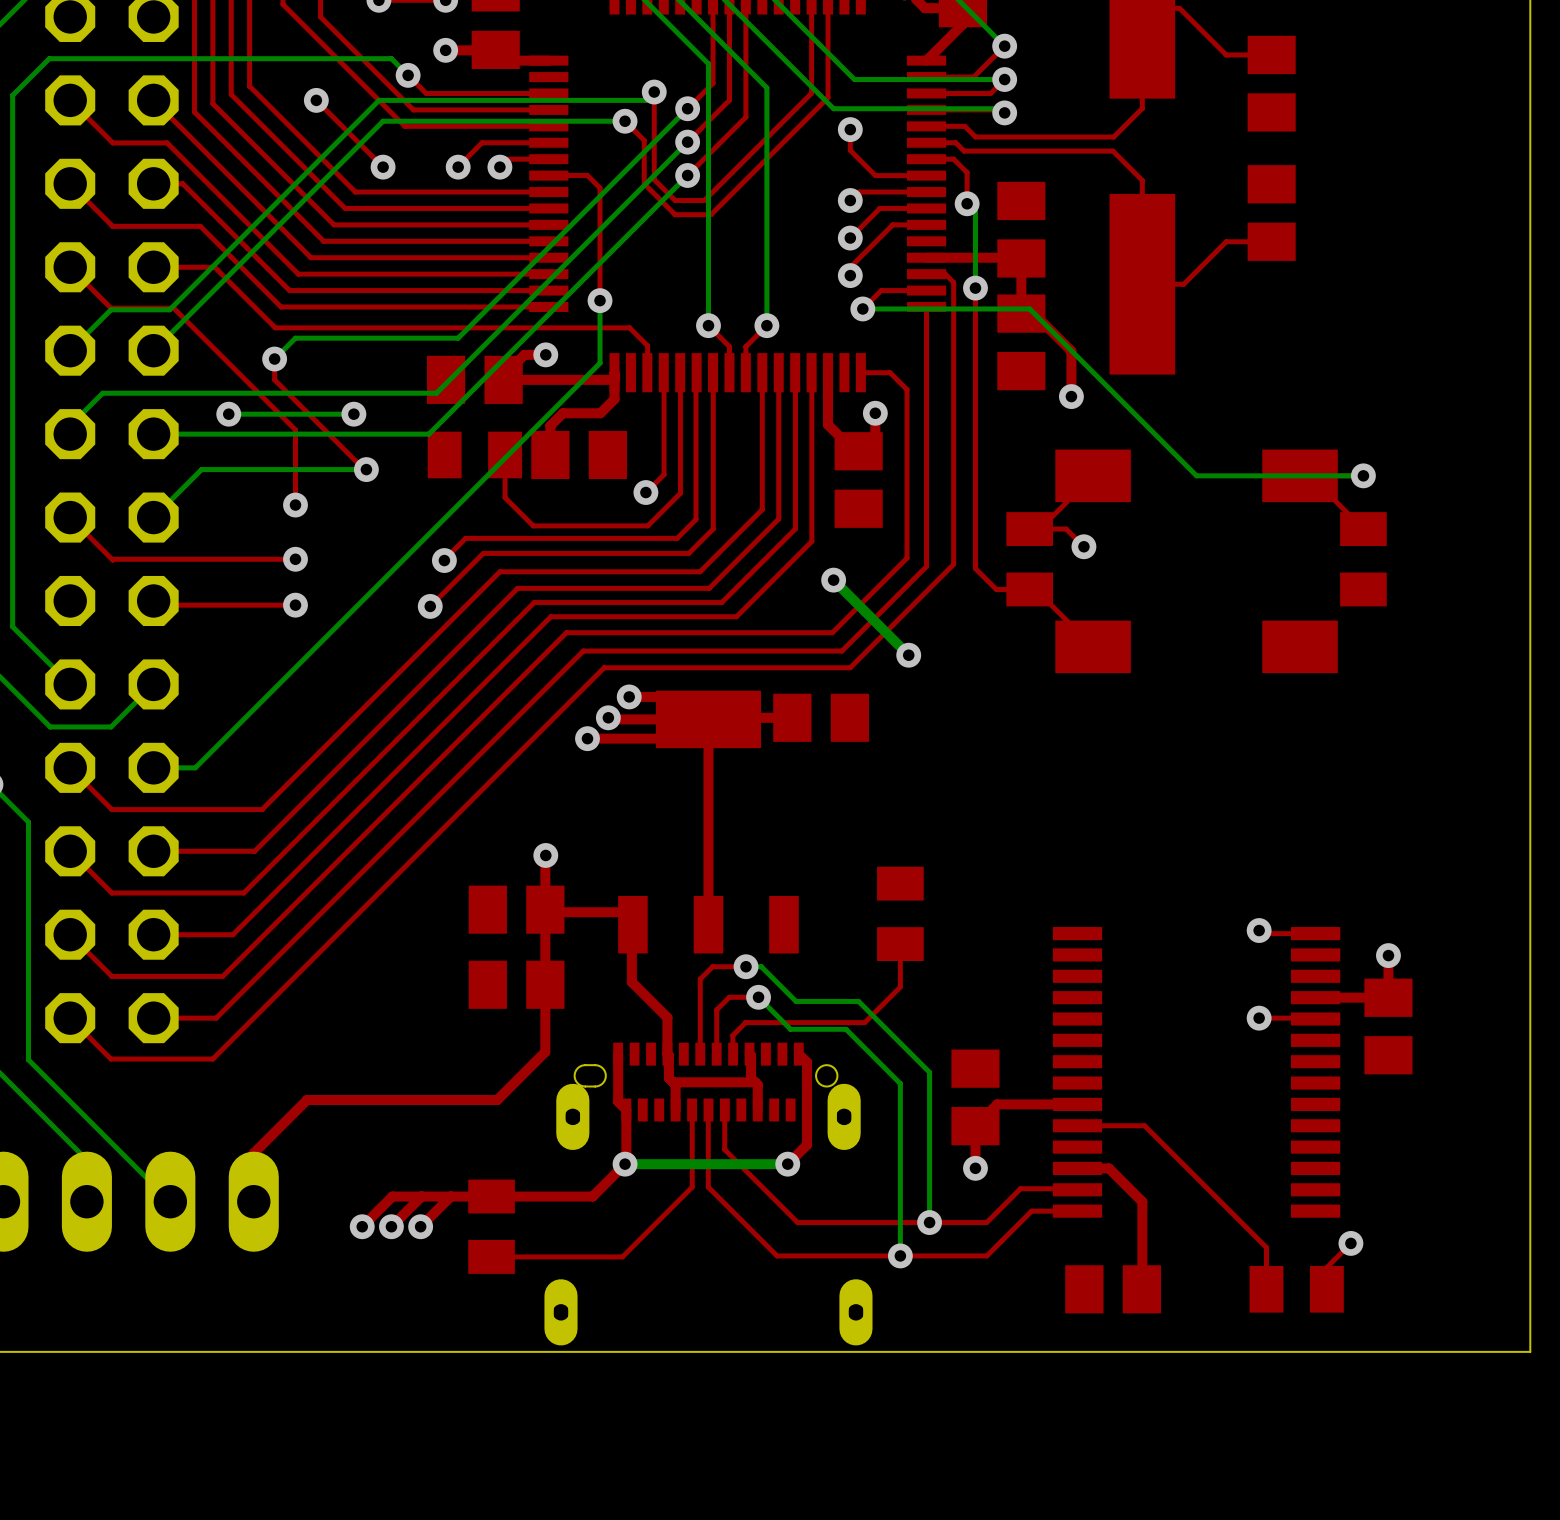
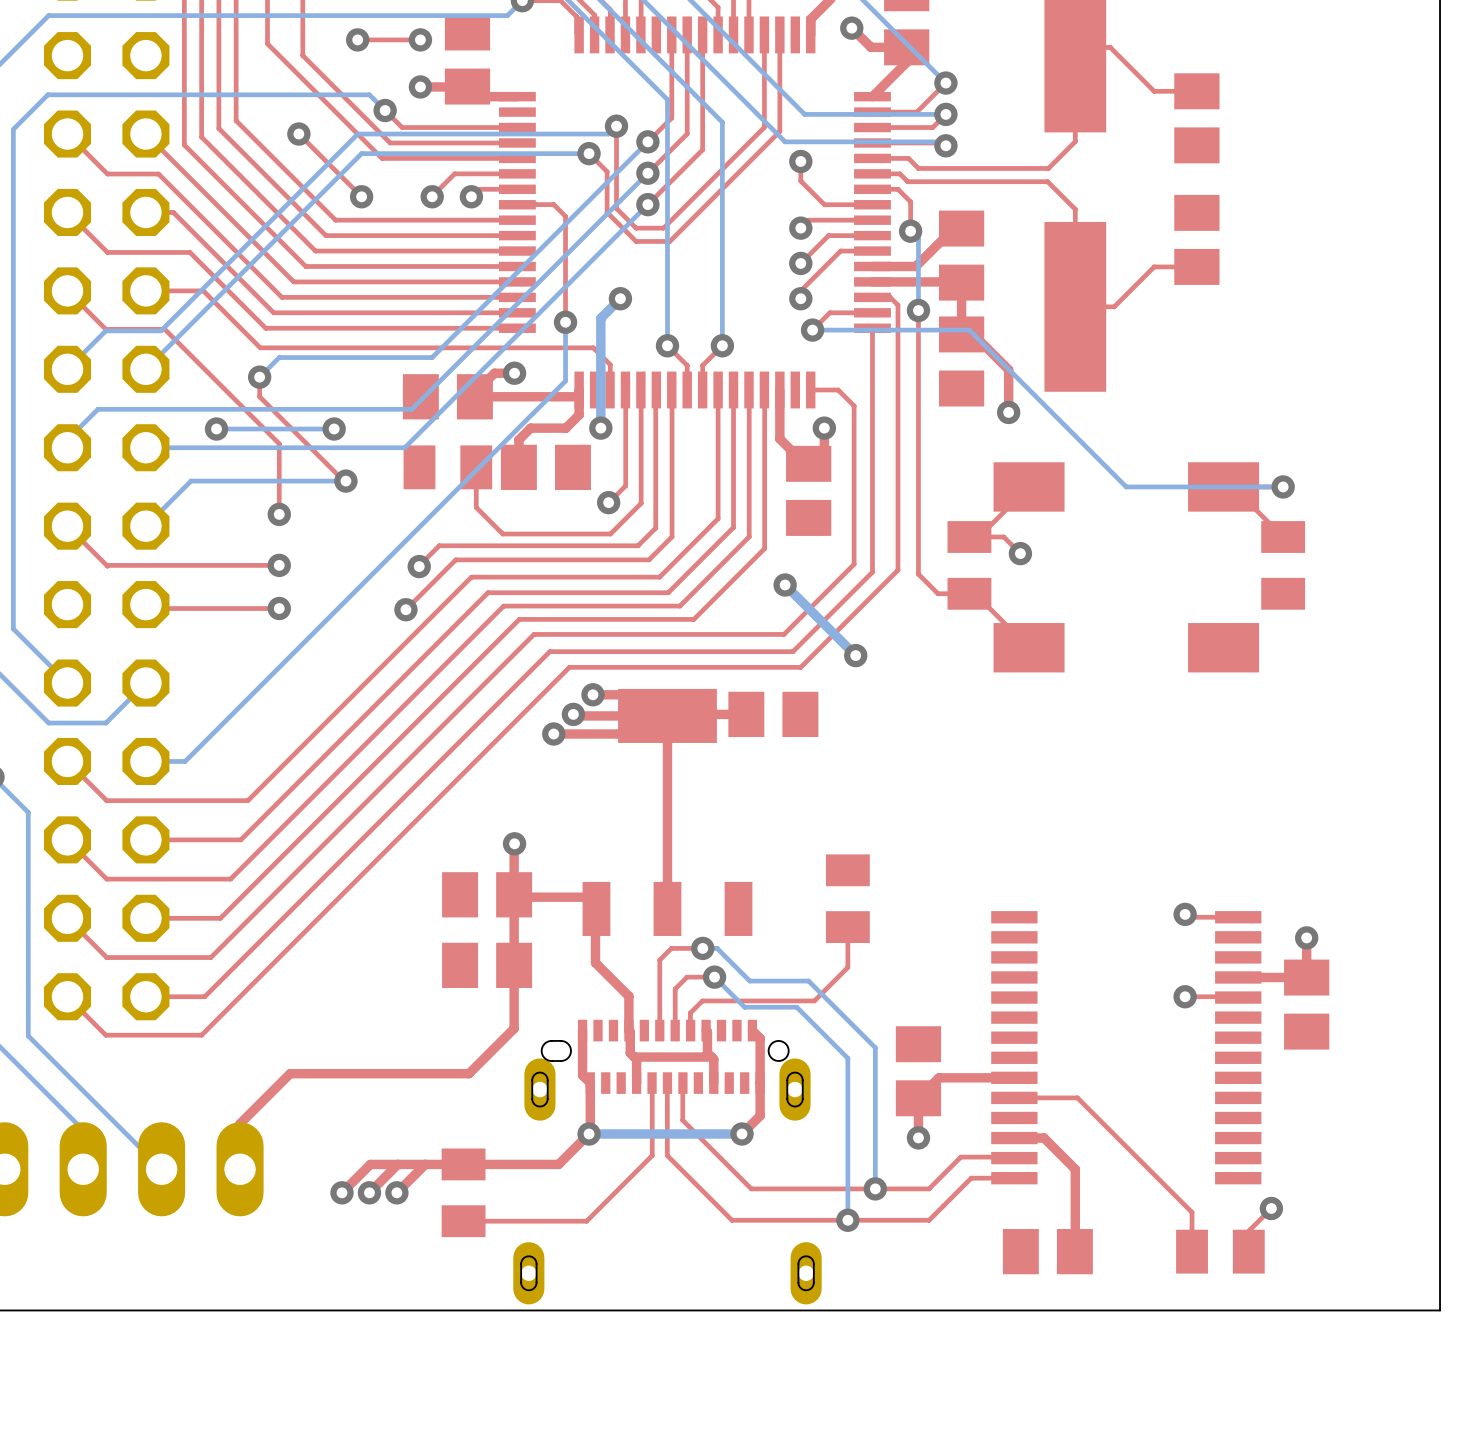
top track: none -> (961, 228) (953, 228) (915, 266) (872, 266)
bottom track: none -> (620, 298) (600, 318) (600, 428)
via: none -> (620, 298)
via: none -> (600, 428)

